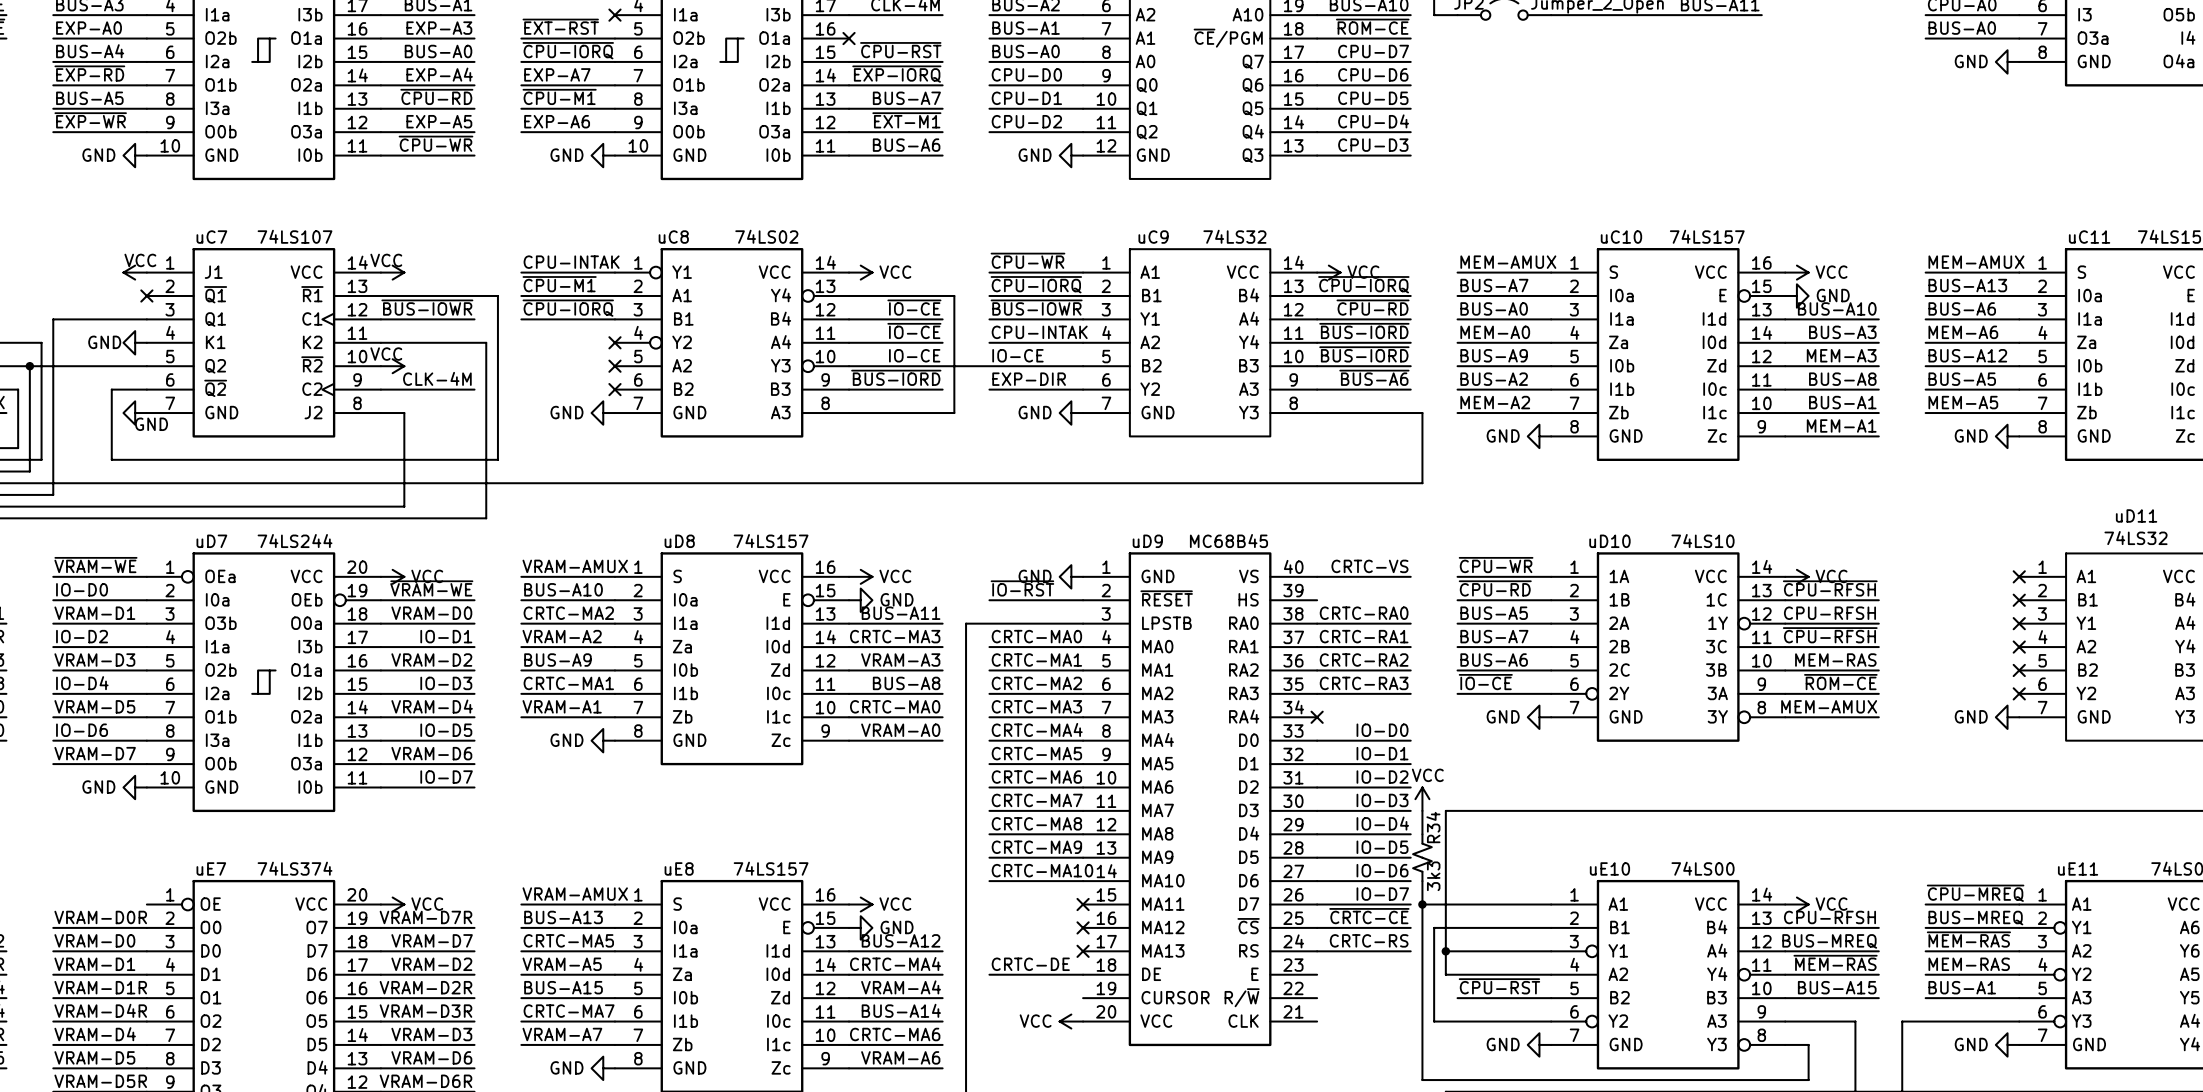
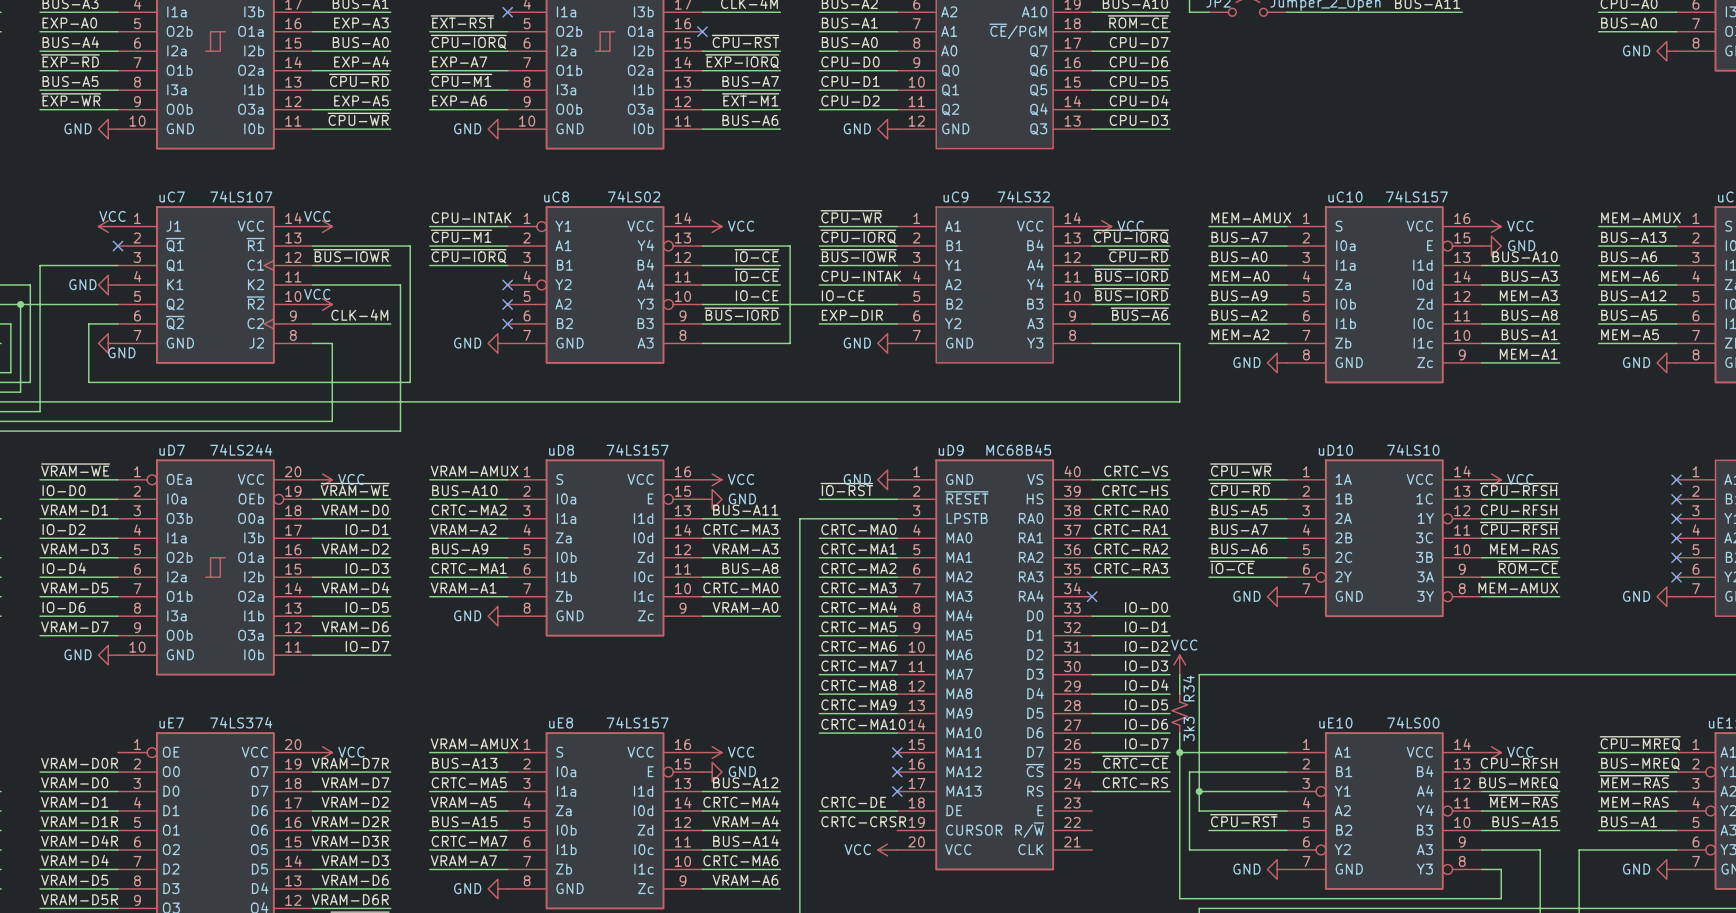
label: none -> CRTC-HS (1135, 490)
wire: none -> (1092, 499) (1170, 499)
label: none -> CRTC-CRSR (863, 821)

